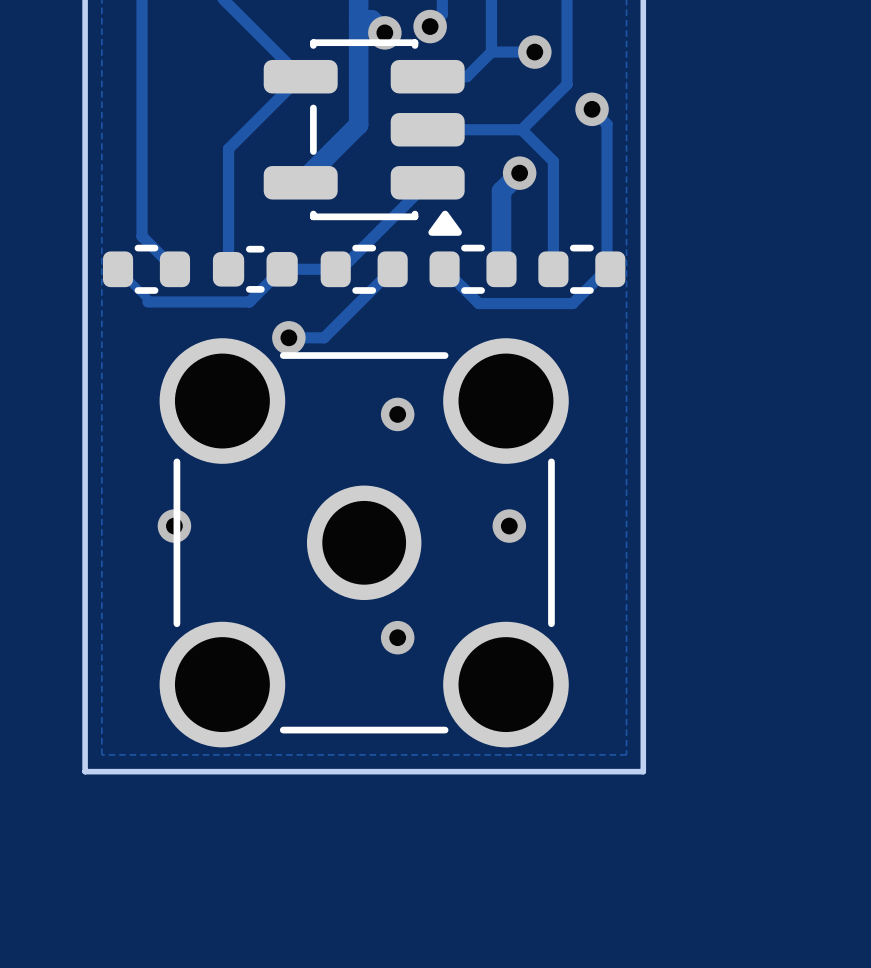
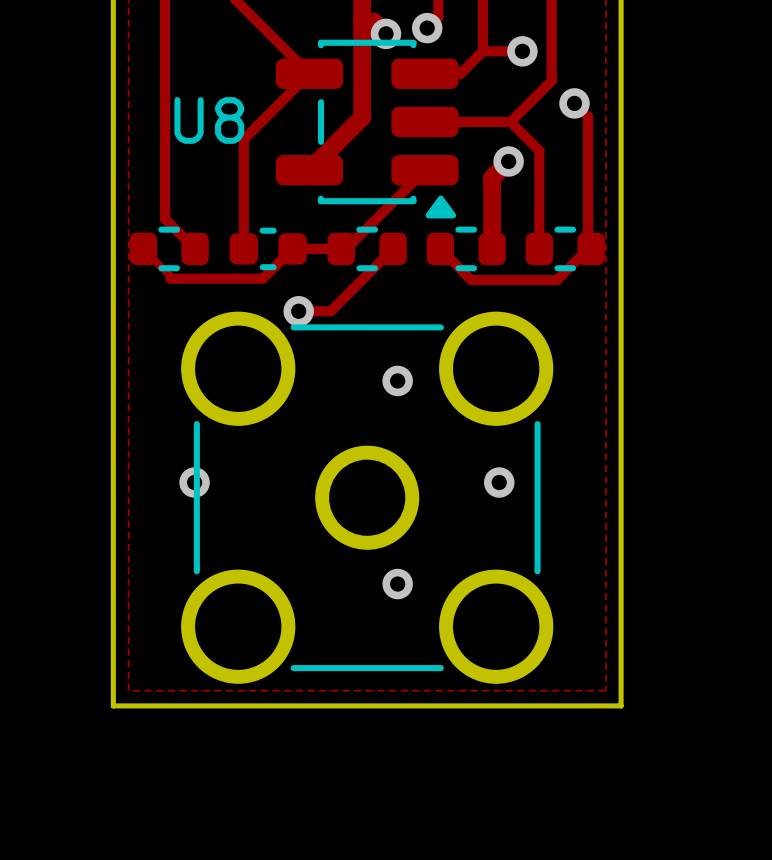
text: none -> U8 (209, 120)

